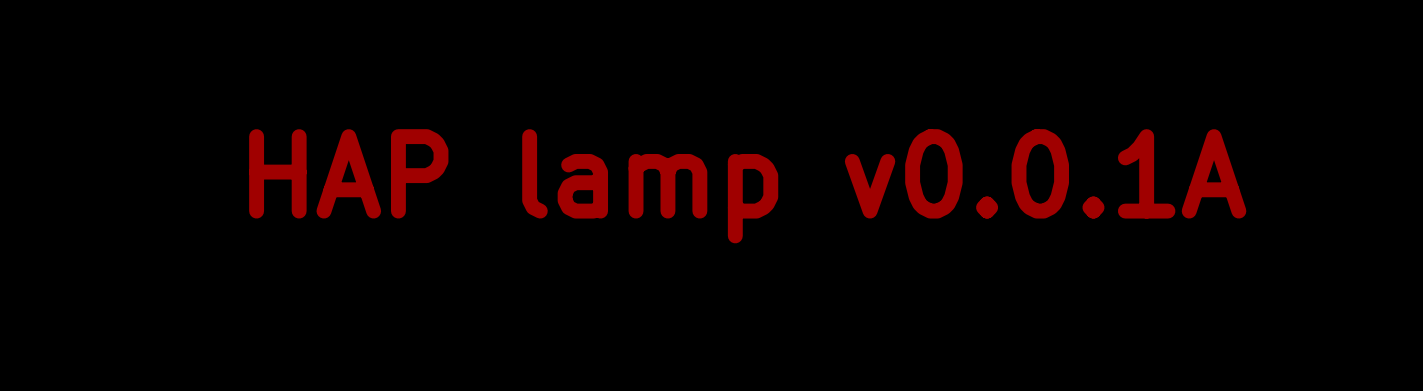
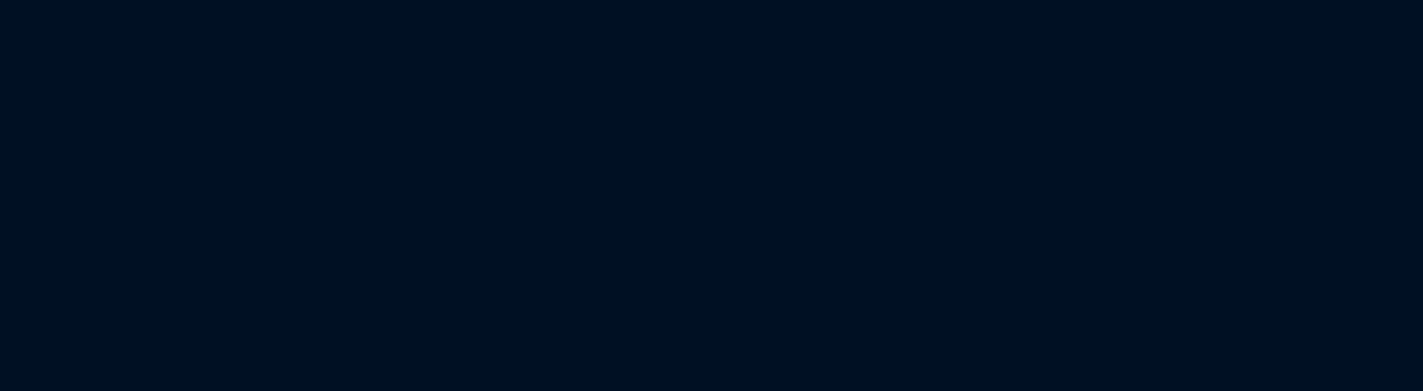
text: HAP lamp v0.0.1A (747, 186) -> none

